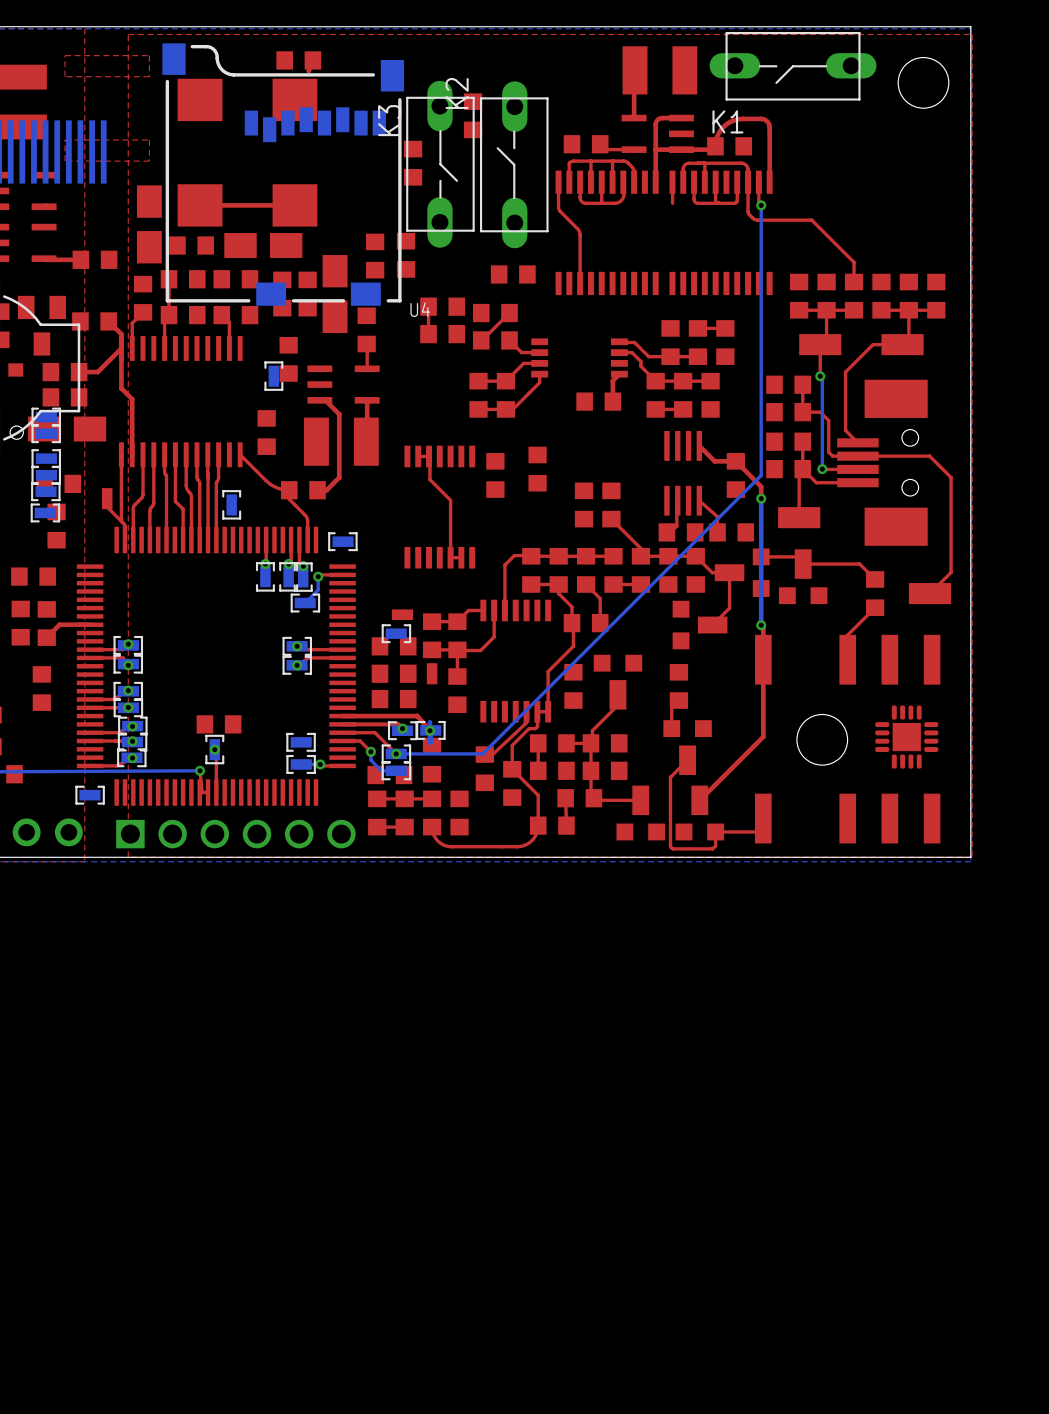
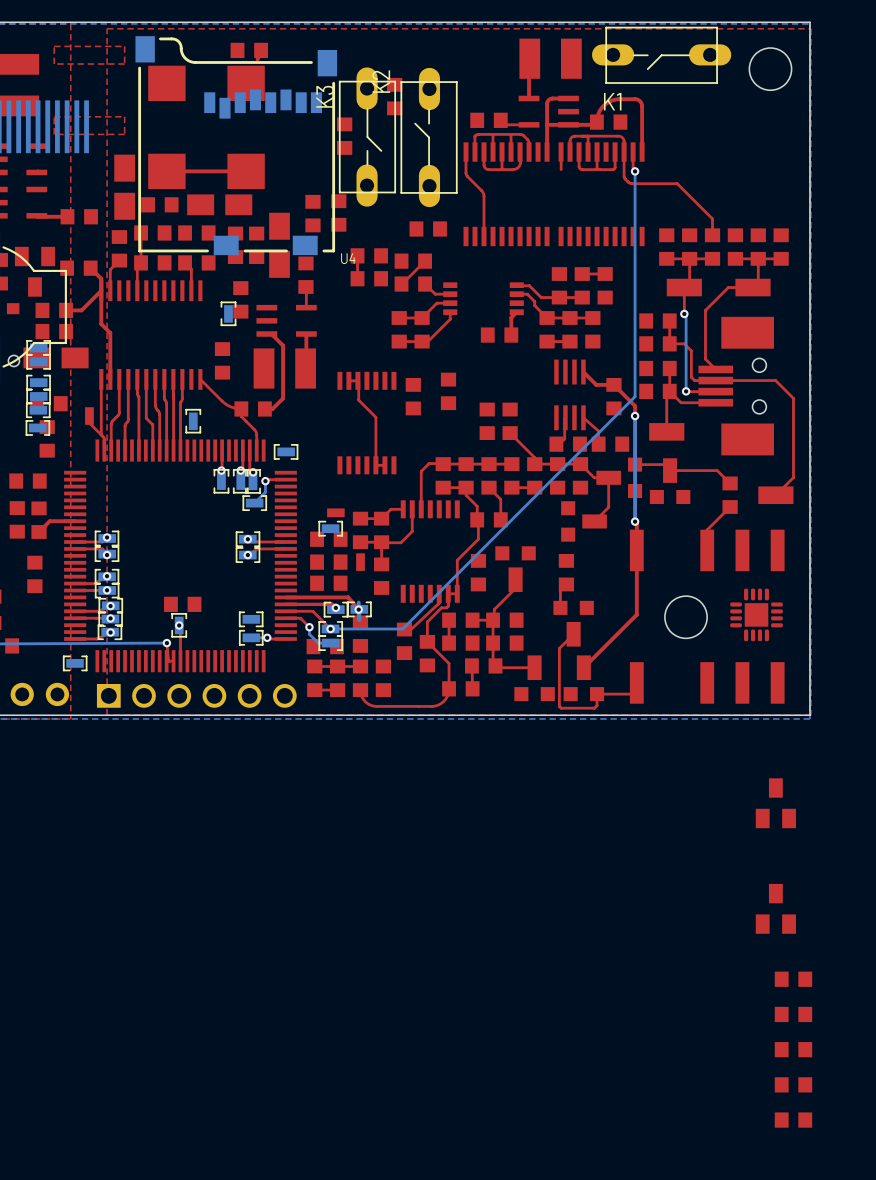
part: none -> (775, 803)
part: none -> (775, 908)
part: none -> (793, 979)
part: none -> (793, 1014)
part: none -> (793, 1049)
part: none -> (793, 1084)
part: none -> (793, 1120)

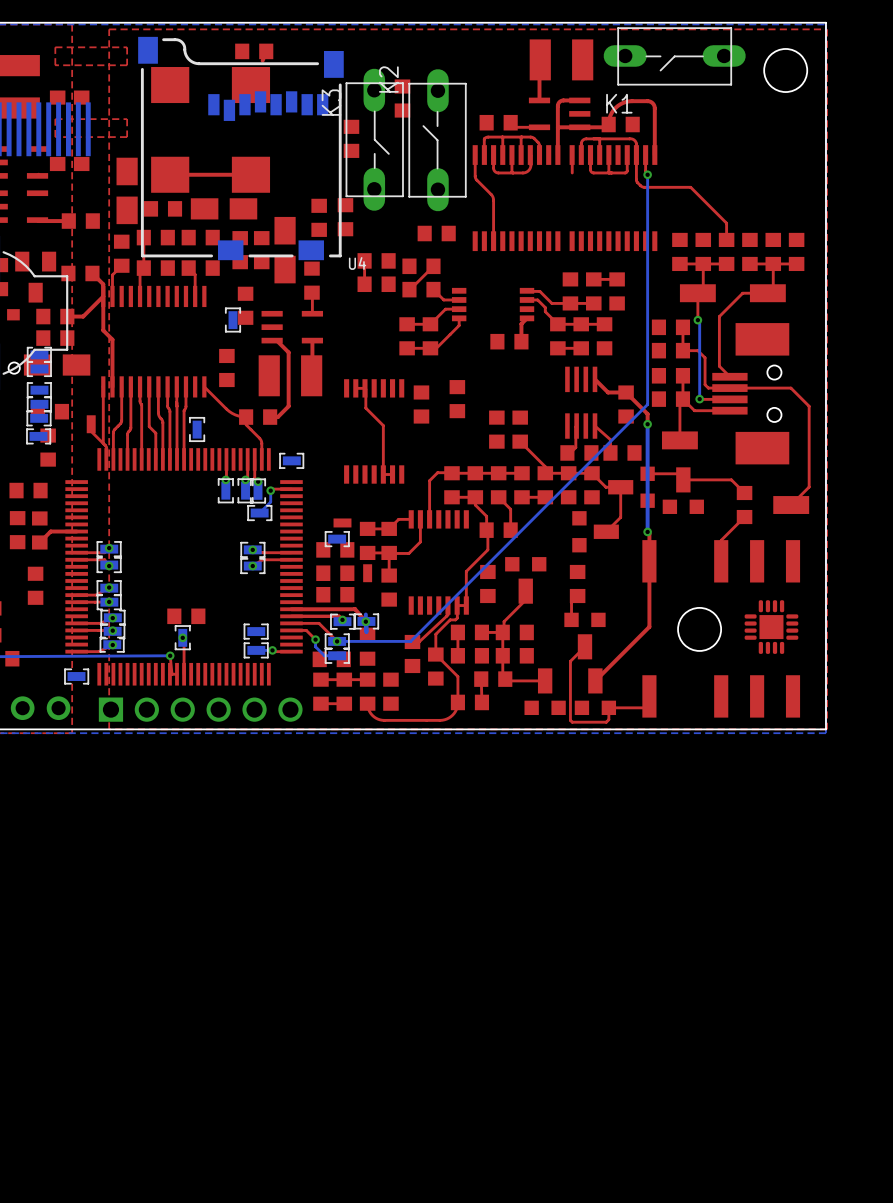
part: none -> (69, 97)
part: none -> (69, 163)
part: (775, 803) -> none
part: (775, 908) -> none
part: (793, 979) -> none
part: (793, 1014) -> none
part: (793, 1049) -> none
part: (793, 1084) -> none
part: (793, 1120) -> none

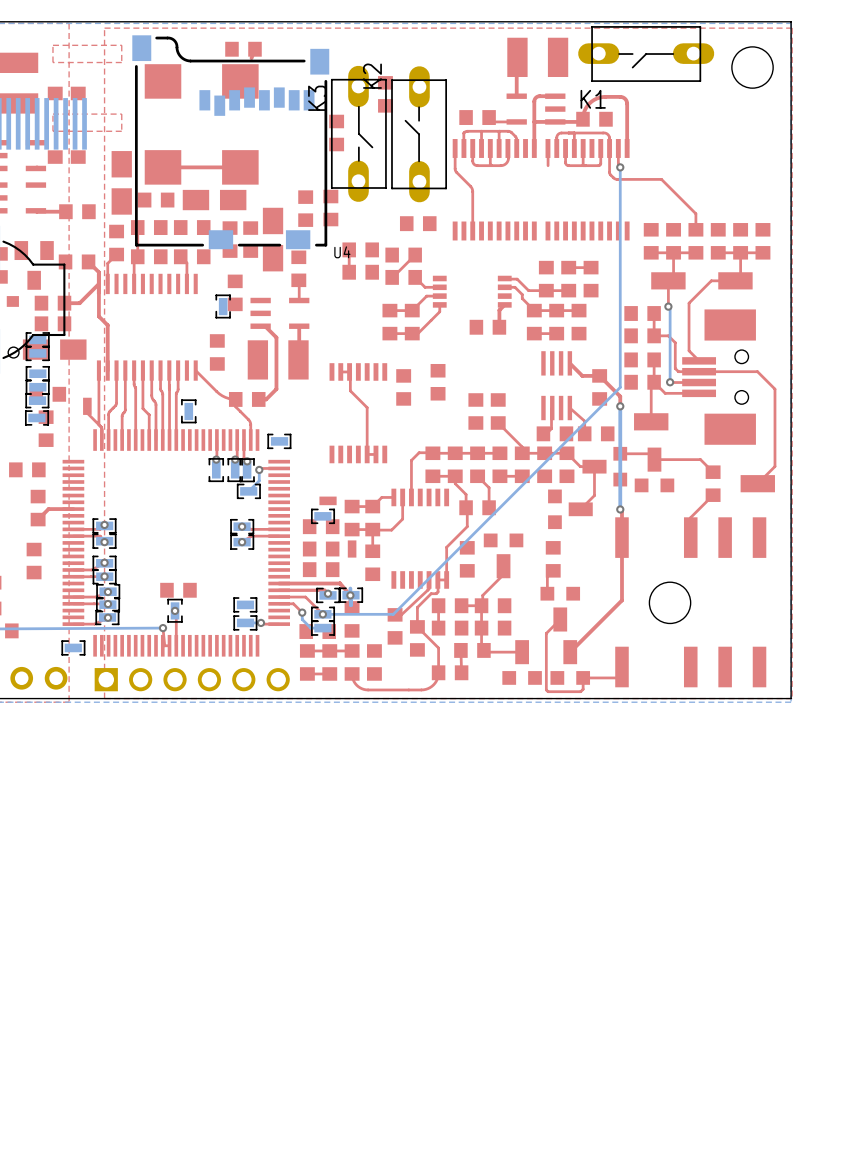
part: (17, 530) -> none
part: (771, 627) -> none

